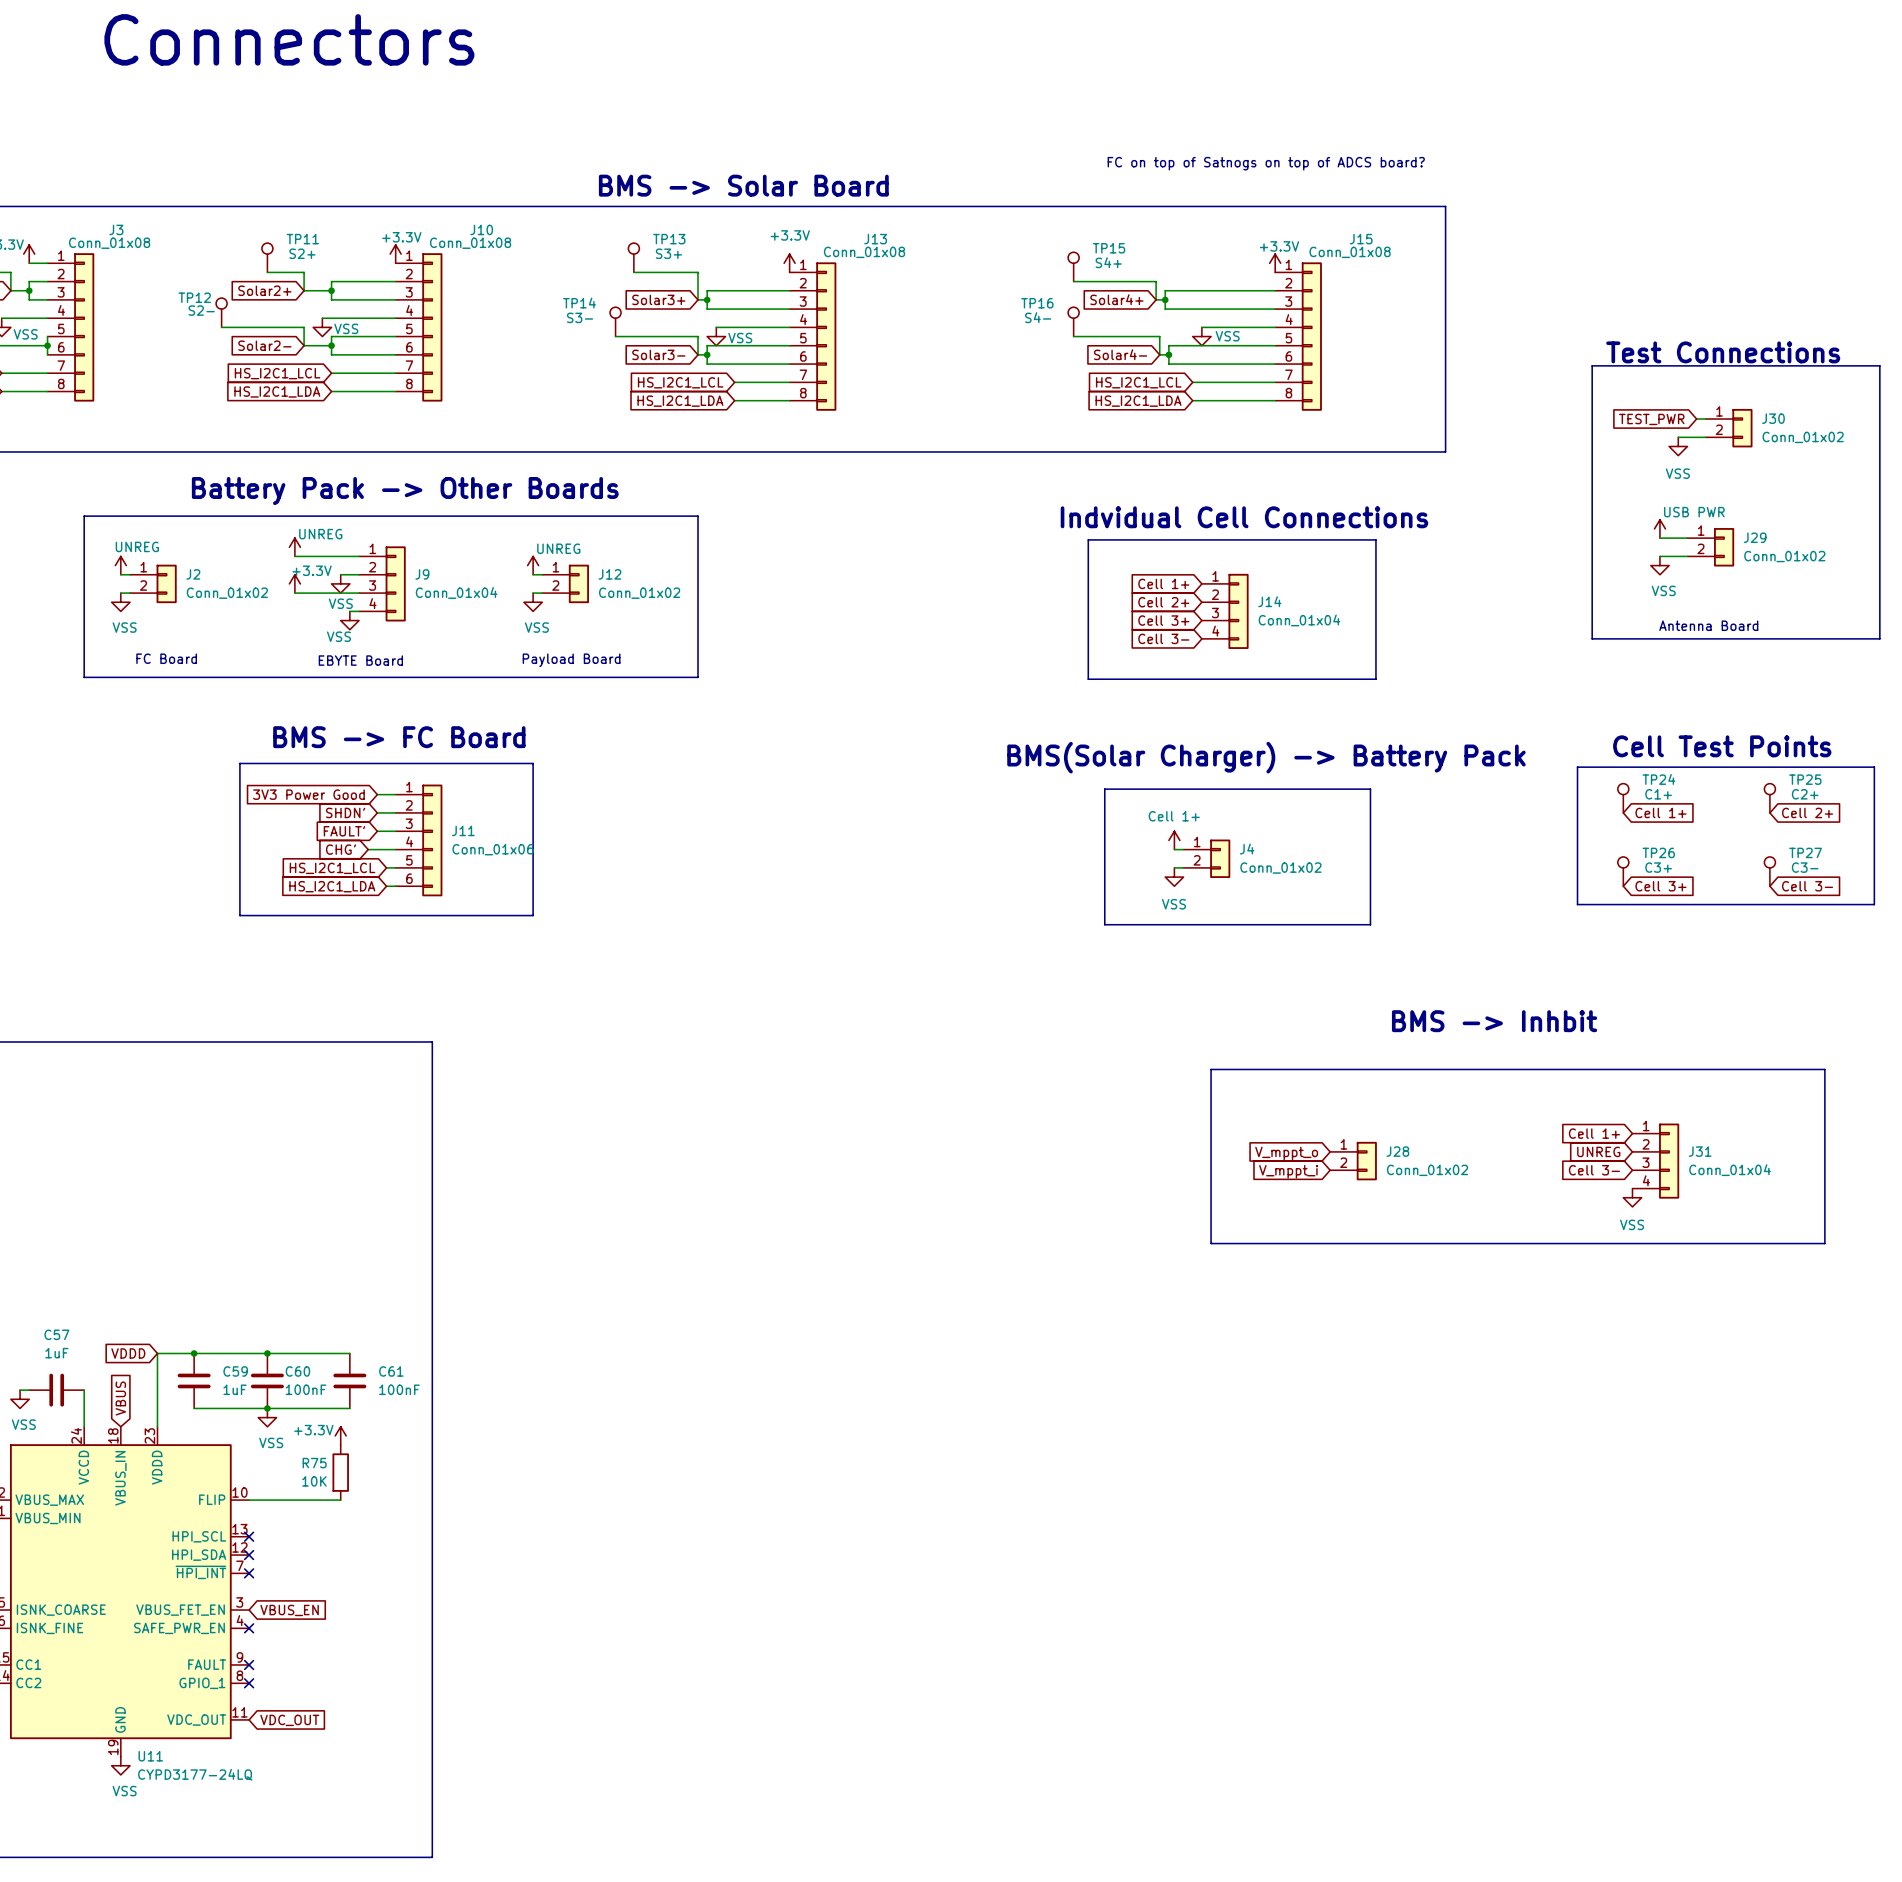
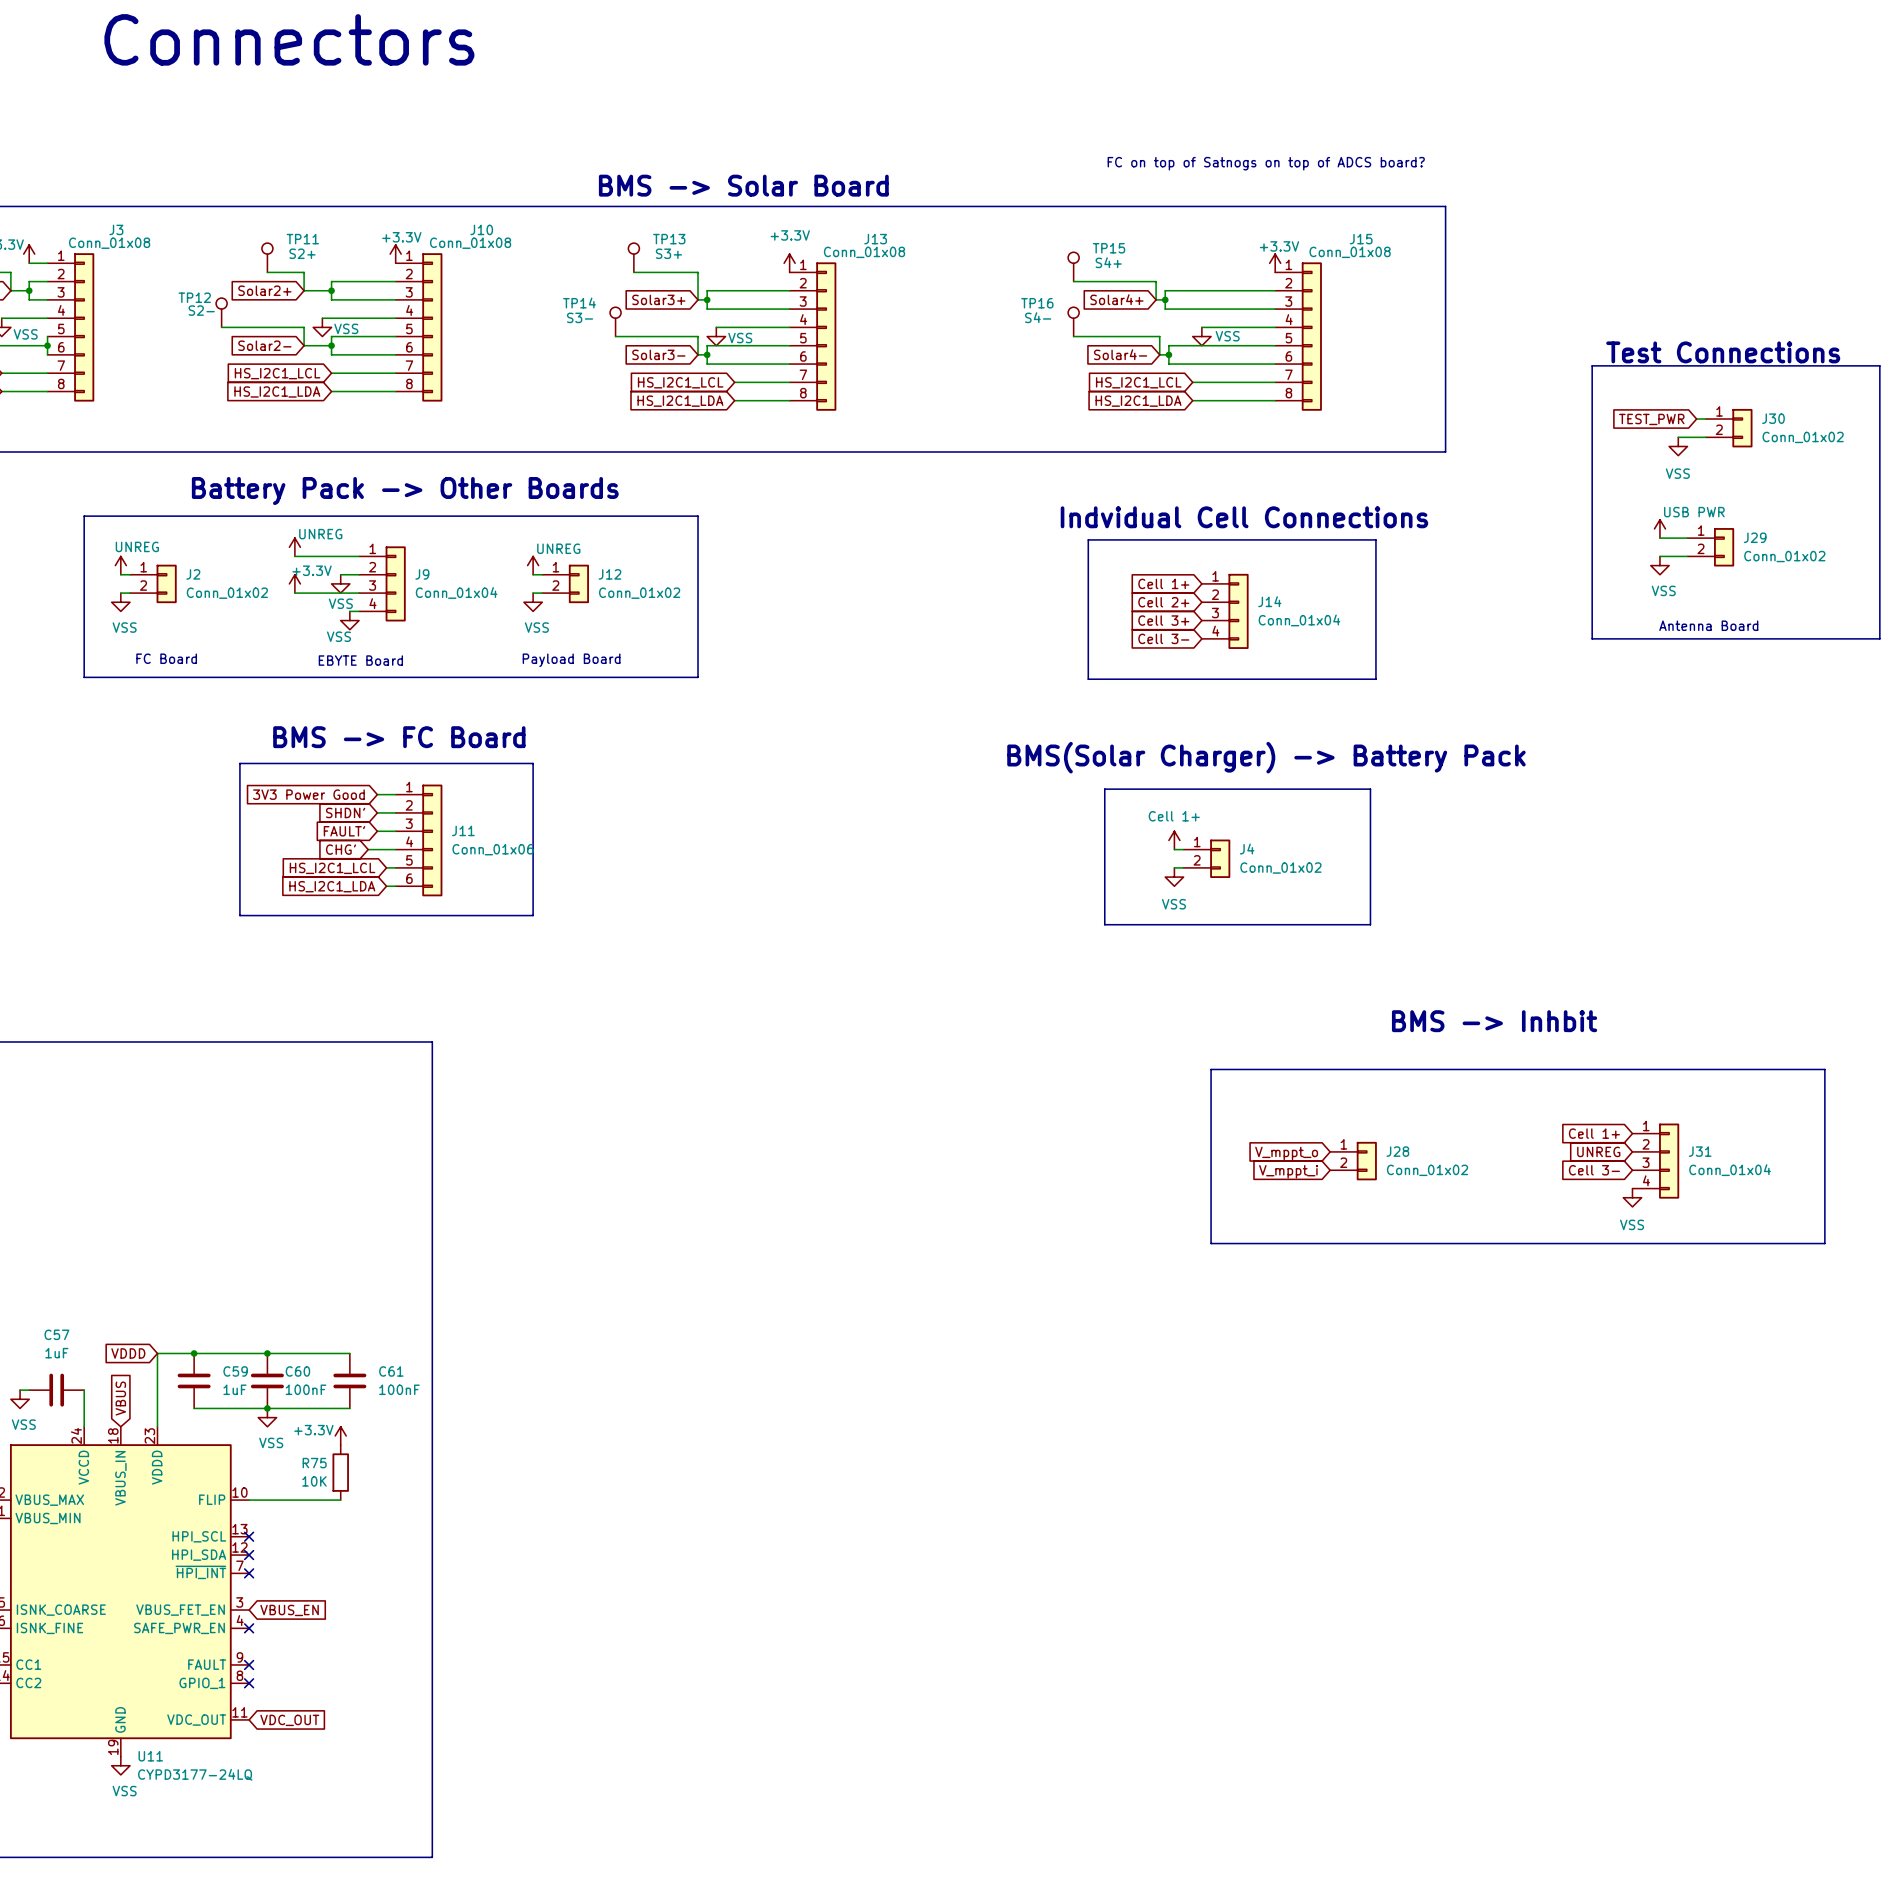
text: Cell Test Points (1722, 746) -> none
line: (1577, 767) (1874, 767) (1874, 904) (1577, 904) (1577, 767) -> none
TP24: C1+ (1623, 798) -> none
TP25: C2+ (1769, 798) -> none
global label: Cell 1+ (1660, 812) -> none
global label: Cell 2+ (1807, 812) -> none
TP26: C3+ (1623, 871) -> none
TP27: C3- (1769, 871) -> none
global label: Cell 3+ (1660, 886) -> none
global label: Cell 3- (1807, 886) -> none

